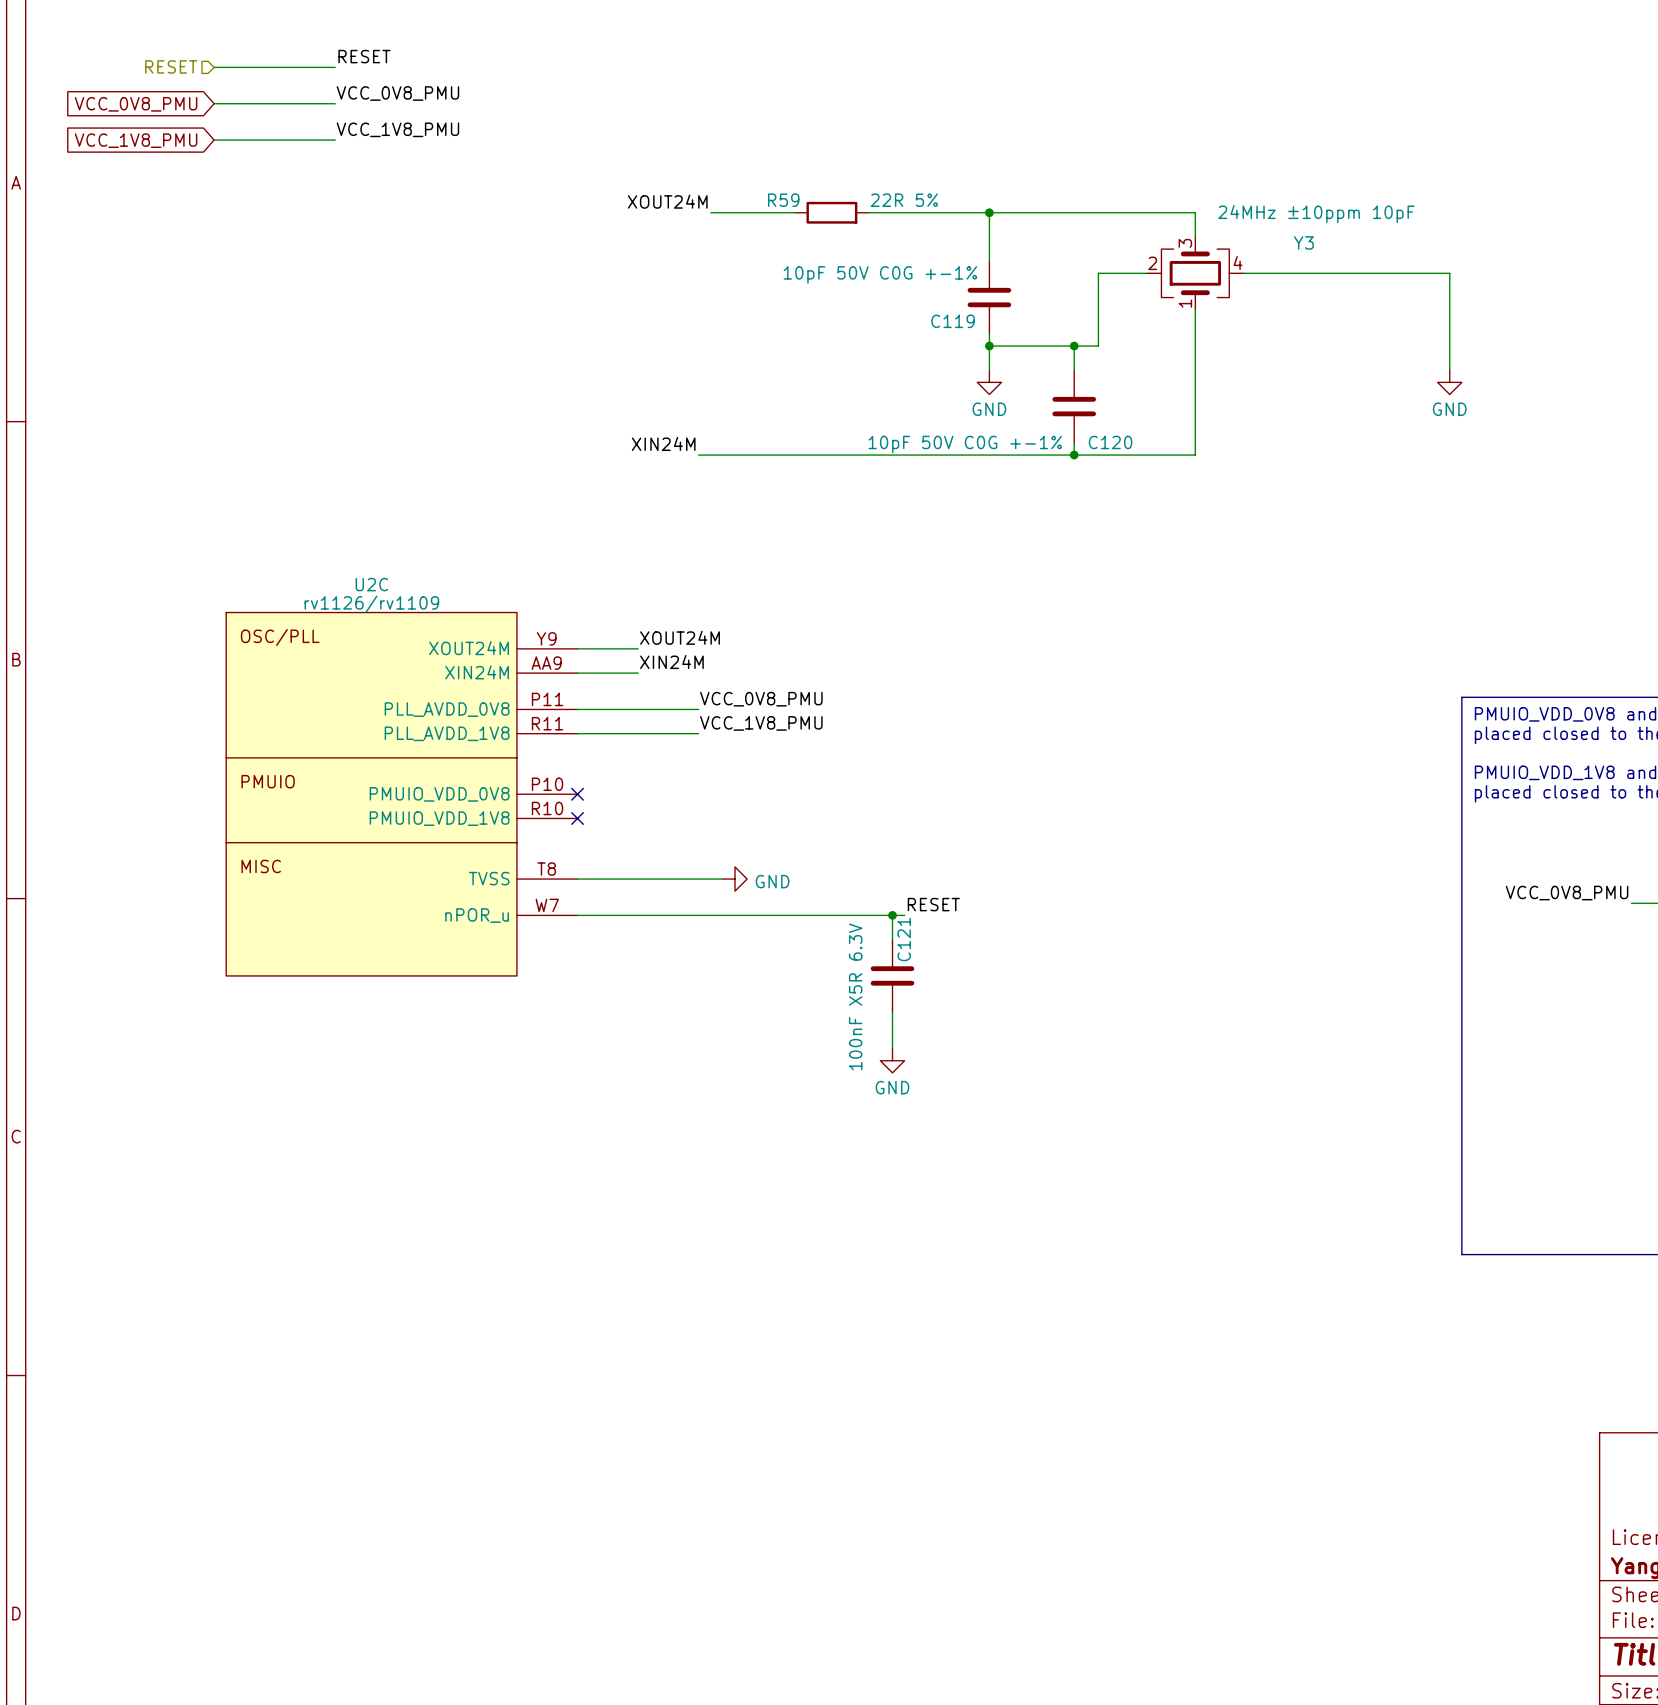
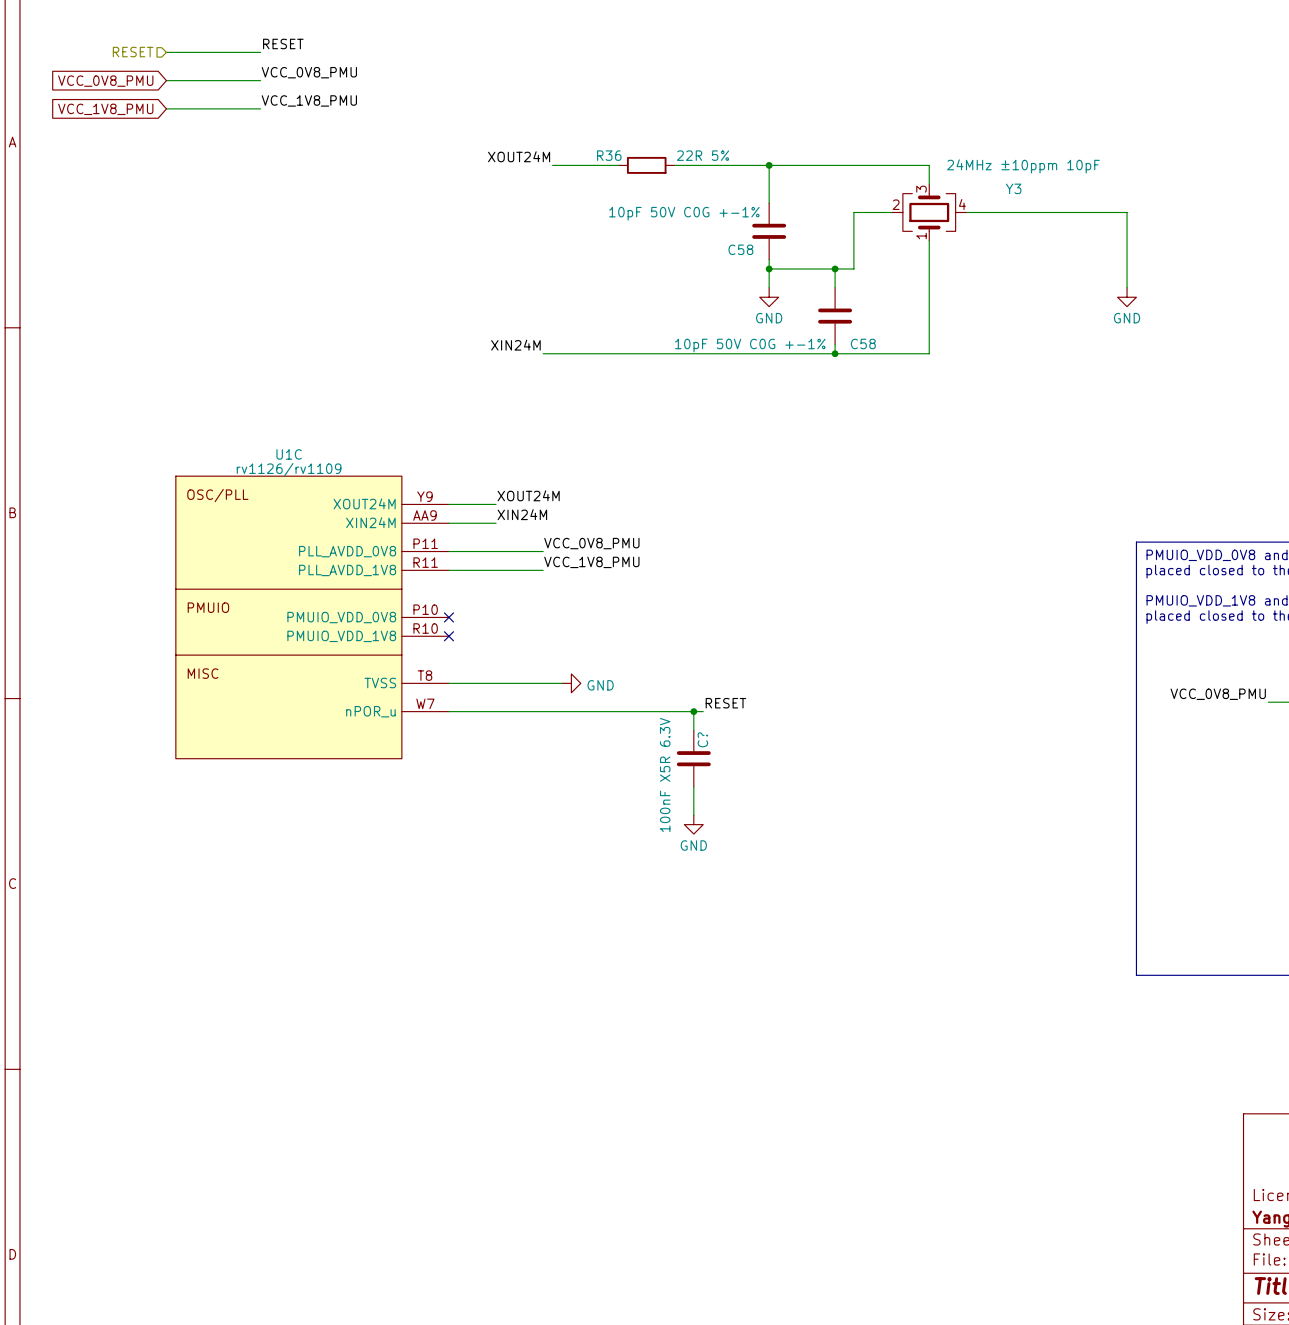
R59 name: R59 (783, 200) -> R36 (609, 155)
C119 name: C119 (953, 321) -> C58 (740, 249)
C120 name: C120 (1110, 442) -> C58 (863, 343)
U2C name: U2C (371, 584) -> U1C (289, 454)
C121 name: C121 (904, 939) -> C? (702, 739)

